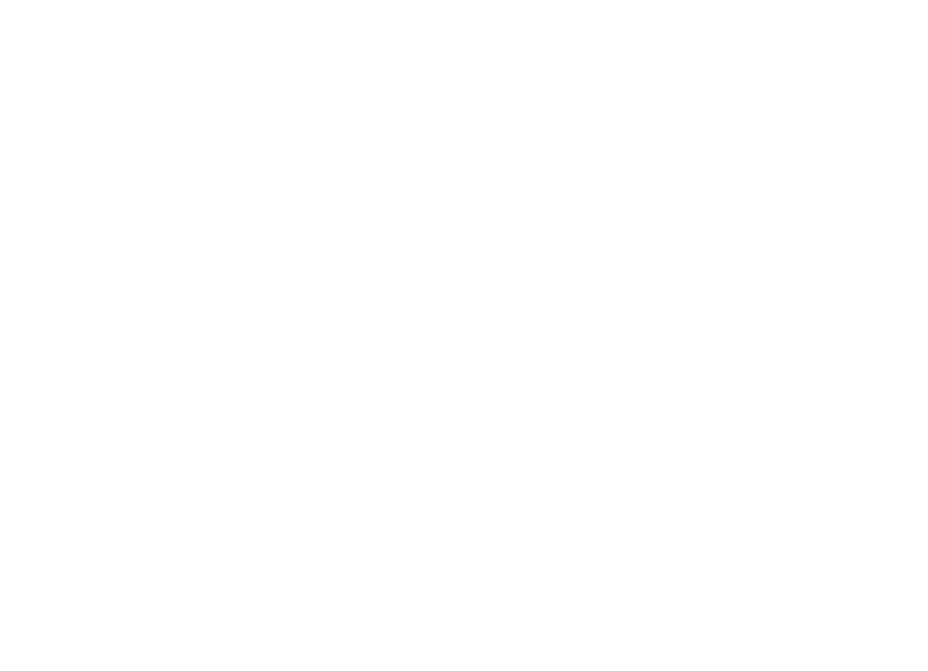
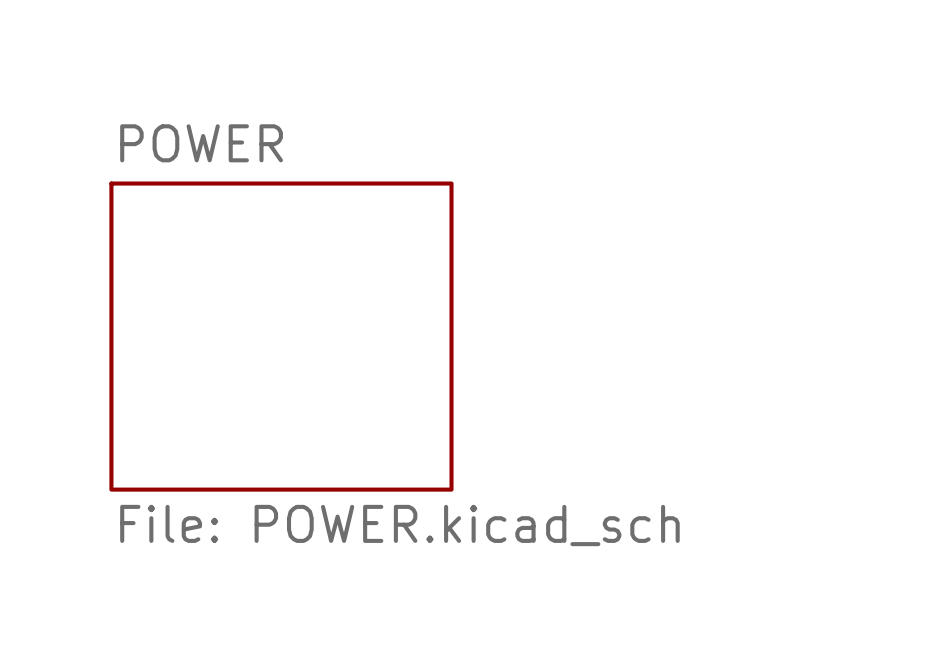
sheet POWER: none -> File: POWER.kicad_sch (281, 336)

